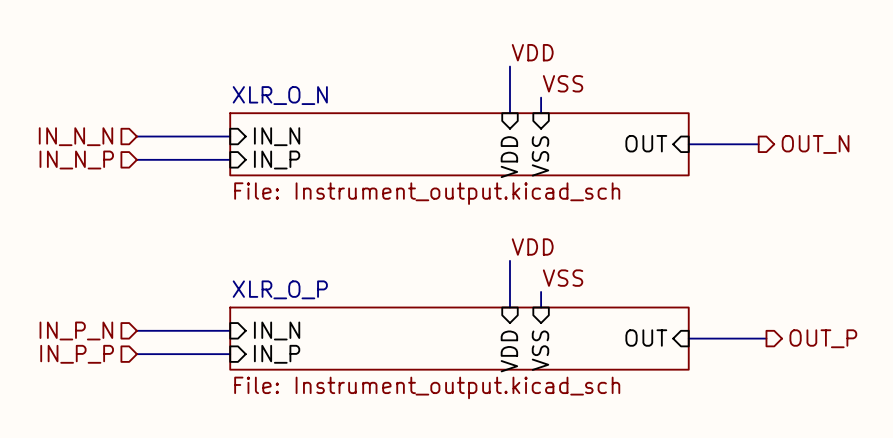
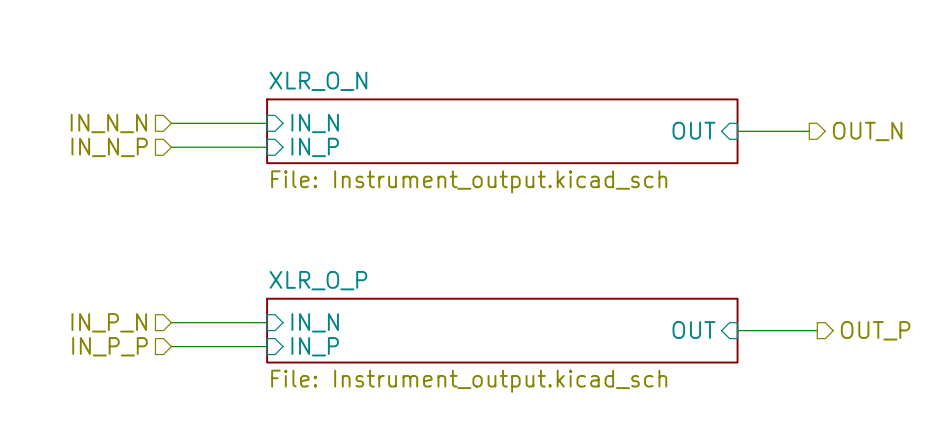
label: VDD (532, 52) -> none
wire: (509, 66) (509, 113) -> none
label: VSS (563, 83) -> none
wire: (541, 97) (541, 113) -> none
sheet pin: VSS (540, 156) -> none
sheet pin: VDD (509, 157) -> none
label: VDD (532, 247) -> none
wire: (509, 260) (509, 307) -> none
label: VSS (563, 278) -> none
wire: (541, 291) (541, 307) -> none
sheet pin: VSS (540, 350) -> none
sheet pin: VDD (509, 351) -> none

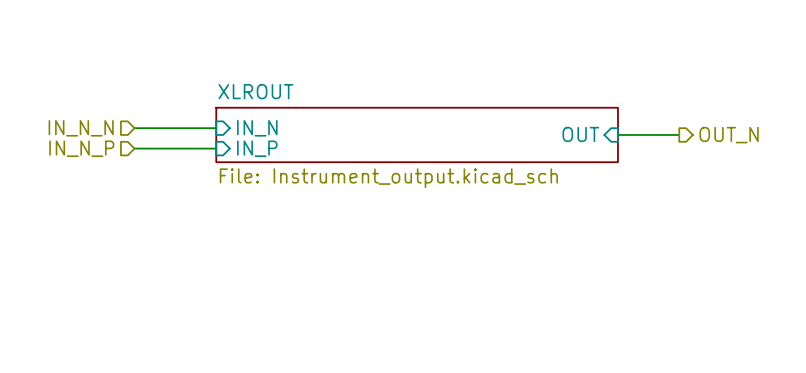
sheet XLR_O_N name: XLR_O_N (318, 81) -> XLROUT (255, 91)
hierarchical label: IN_P_N (109, 322) -> none
wire: (171, 322) (267, 322) -> none
sheet pin: IN_N (315, 322) -> none
sheet XLR_O_P: File: Instrument_output.kicad_sch (502, 330) -> none
sheet pin: OUT (694, 330) -> none
wire: (737, 330) (817, 330) -> none
hierarchical label: OUT_P (875, 330) -> none
hierarchical label: IN_P_P (110, 346) -> none
wire: (171, 346) (267, 346) -> none
sheet pin: IN_P (315, 346) -> none

